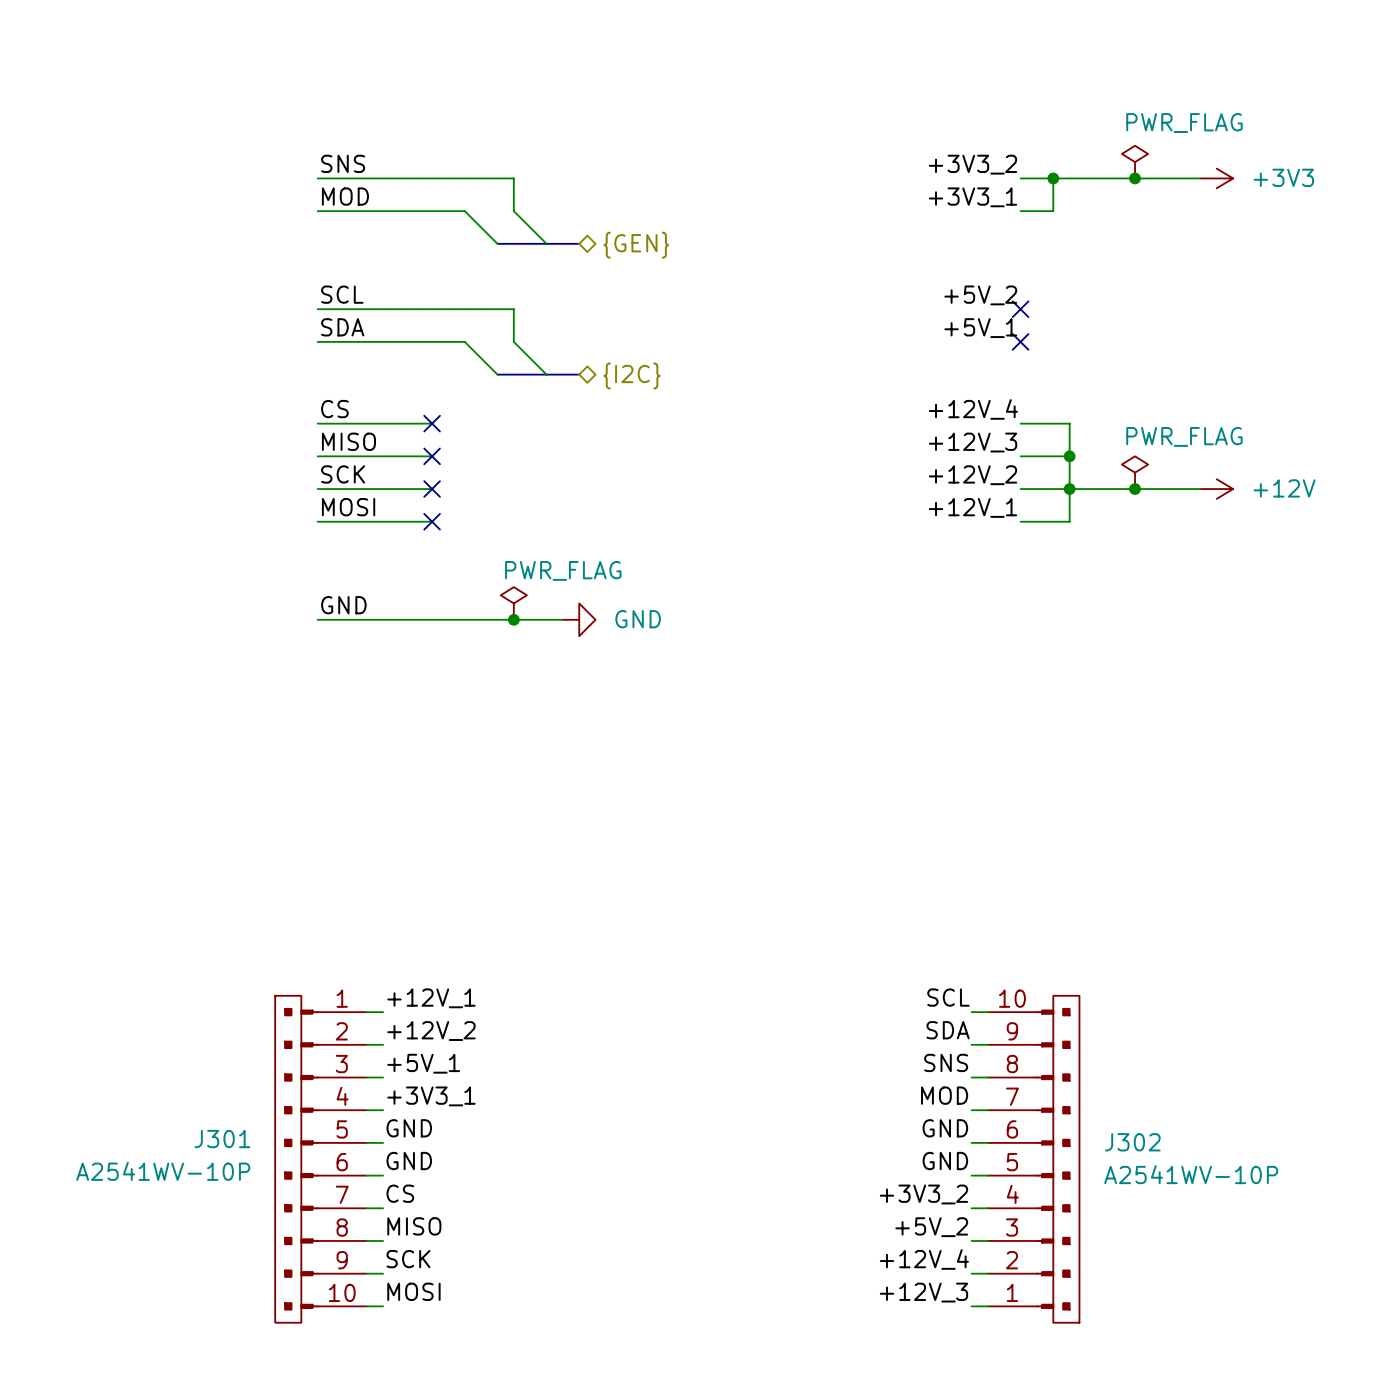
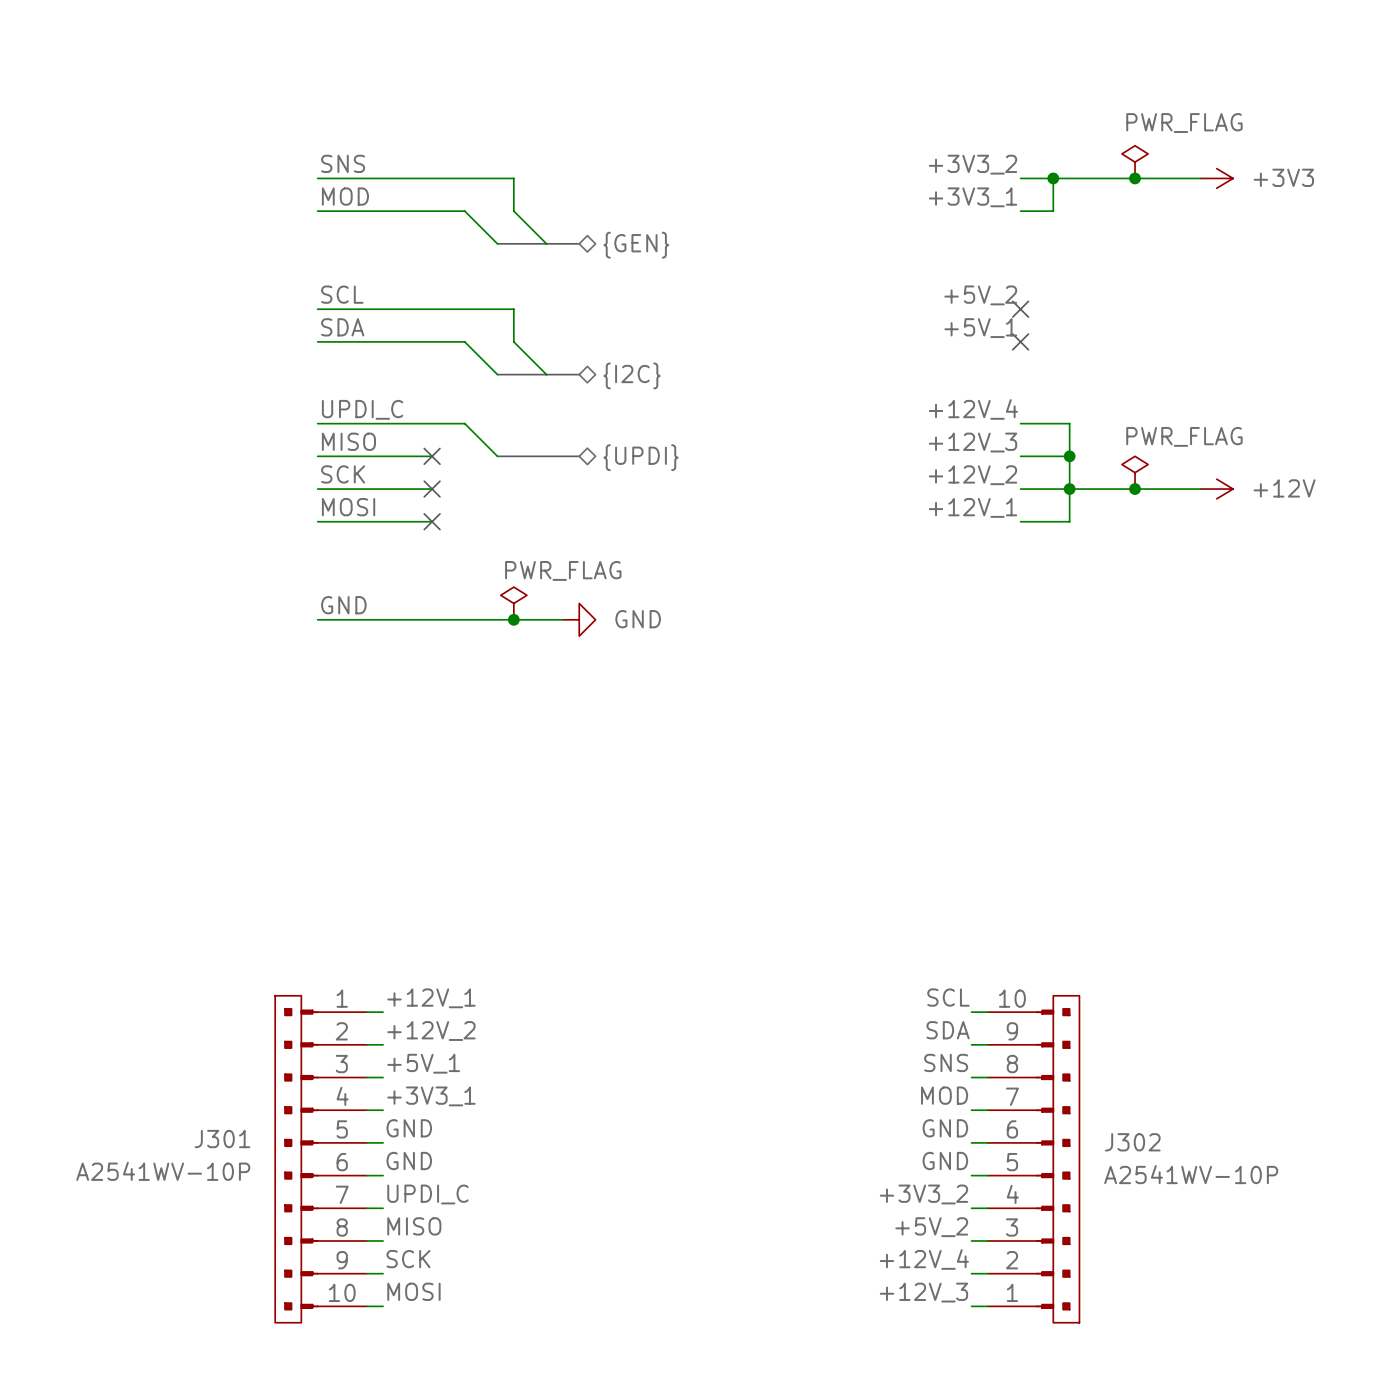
label: CS (334, 409) -> UPDI_C (362, 409)
wire: none -> (432, 423) (464, 423) (497, 456)
no-connect mark: (432, 423) -> none
bus: none -> (497, 456) (579, 456)
hierarchical label: none -> {UPDI} (640, 457)
label: CS (400, 1193) -> UPDI_C (427, 1194)

